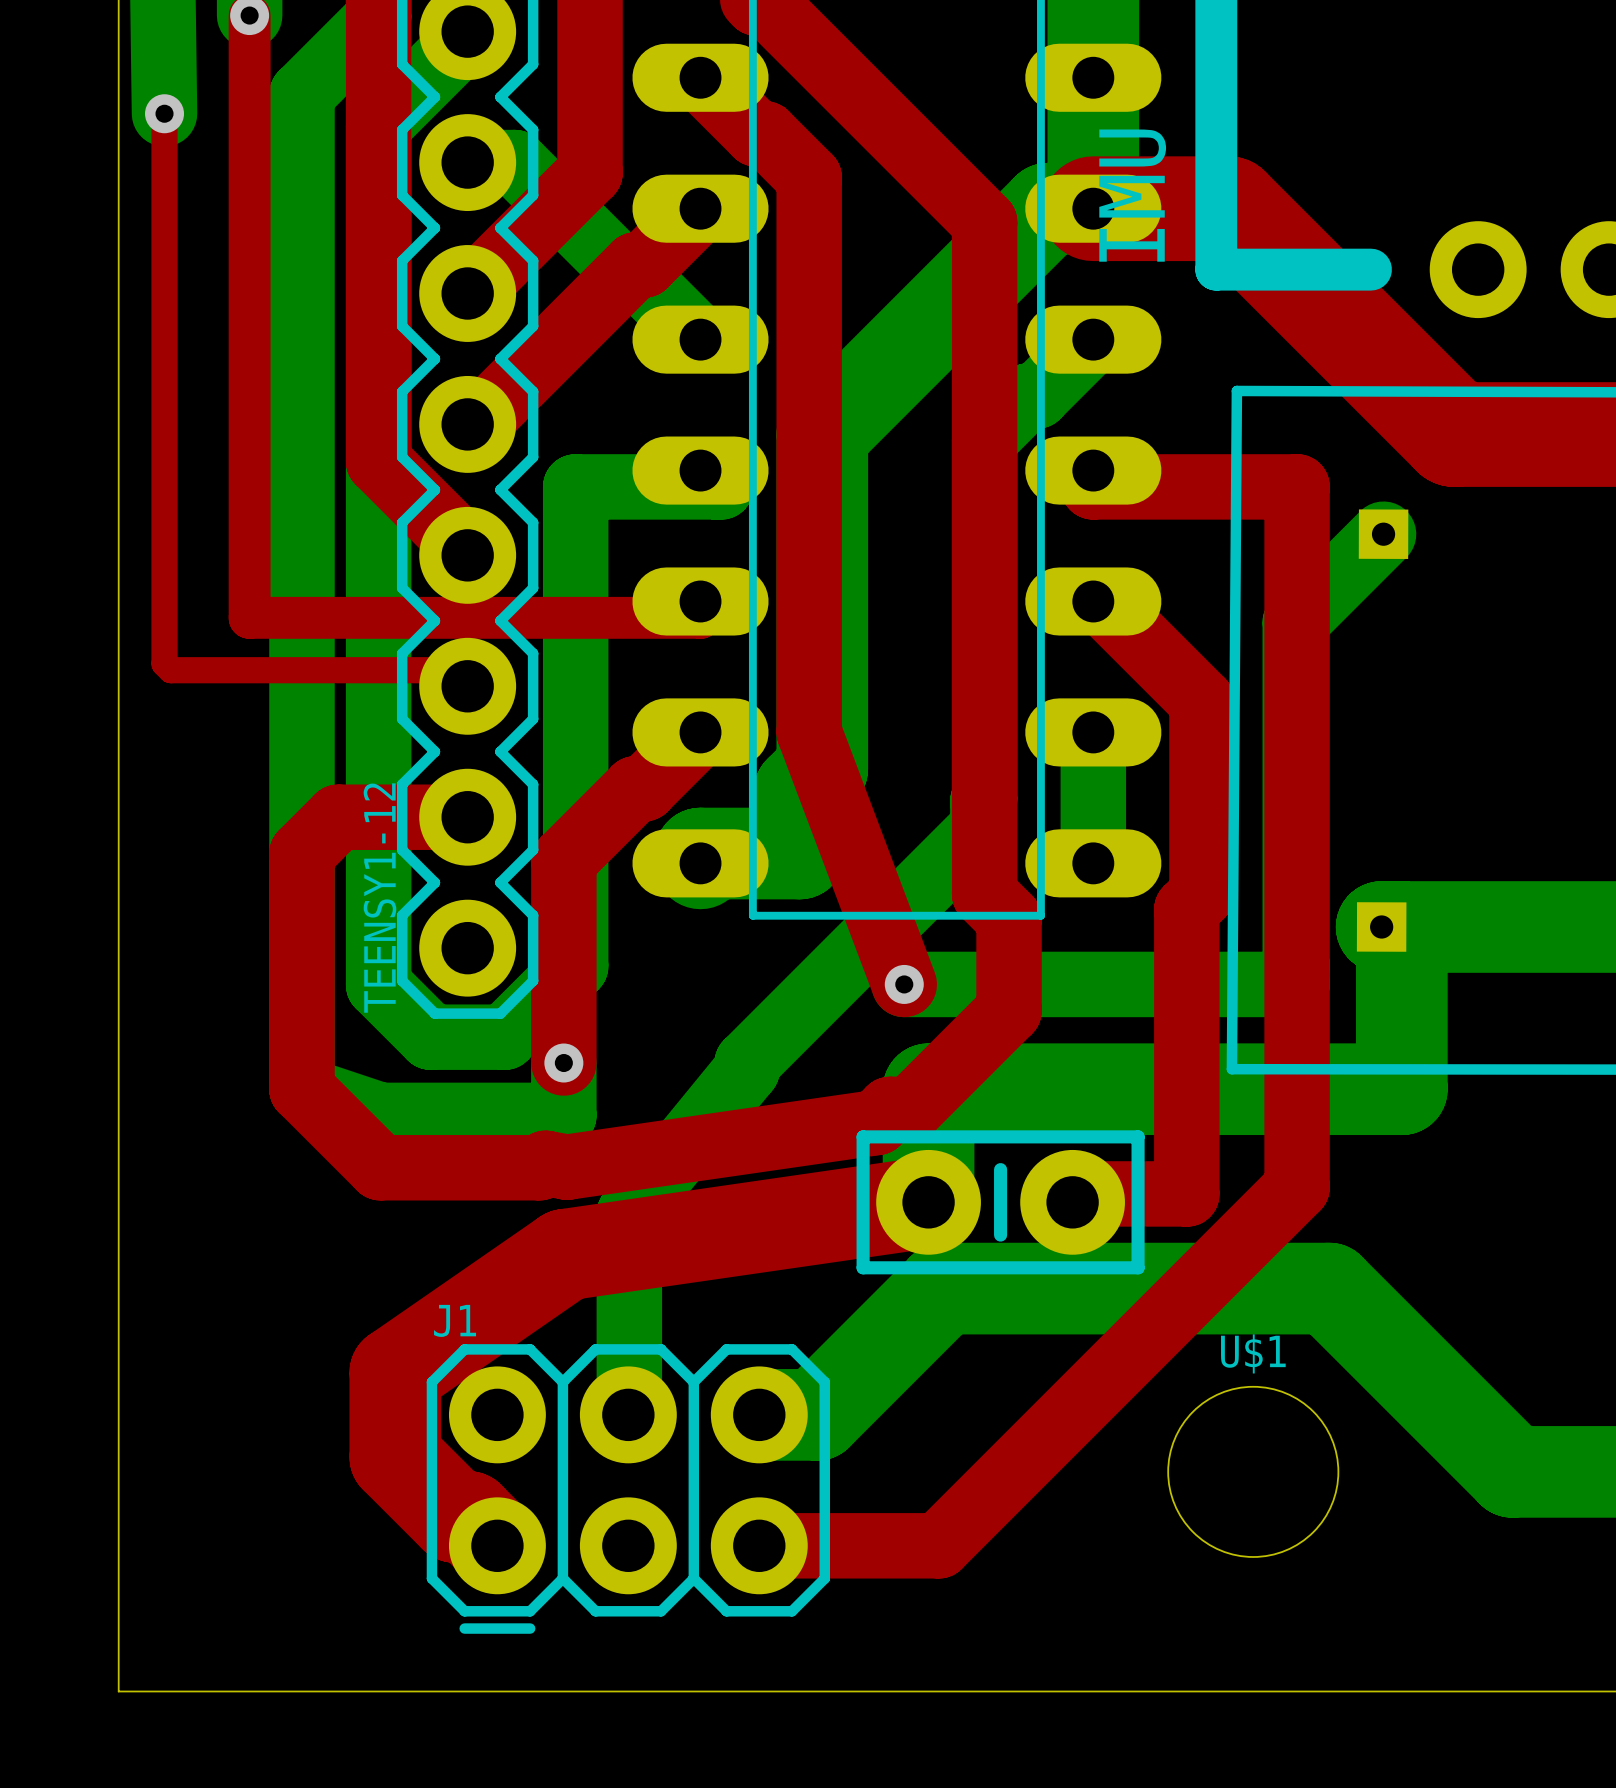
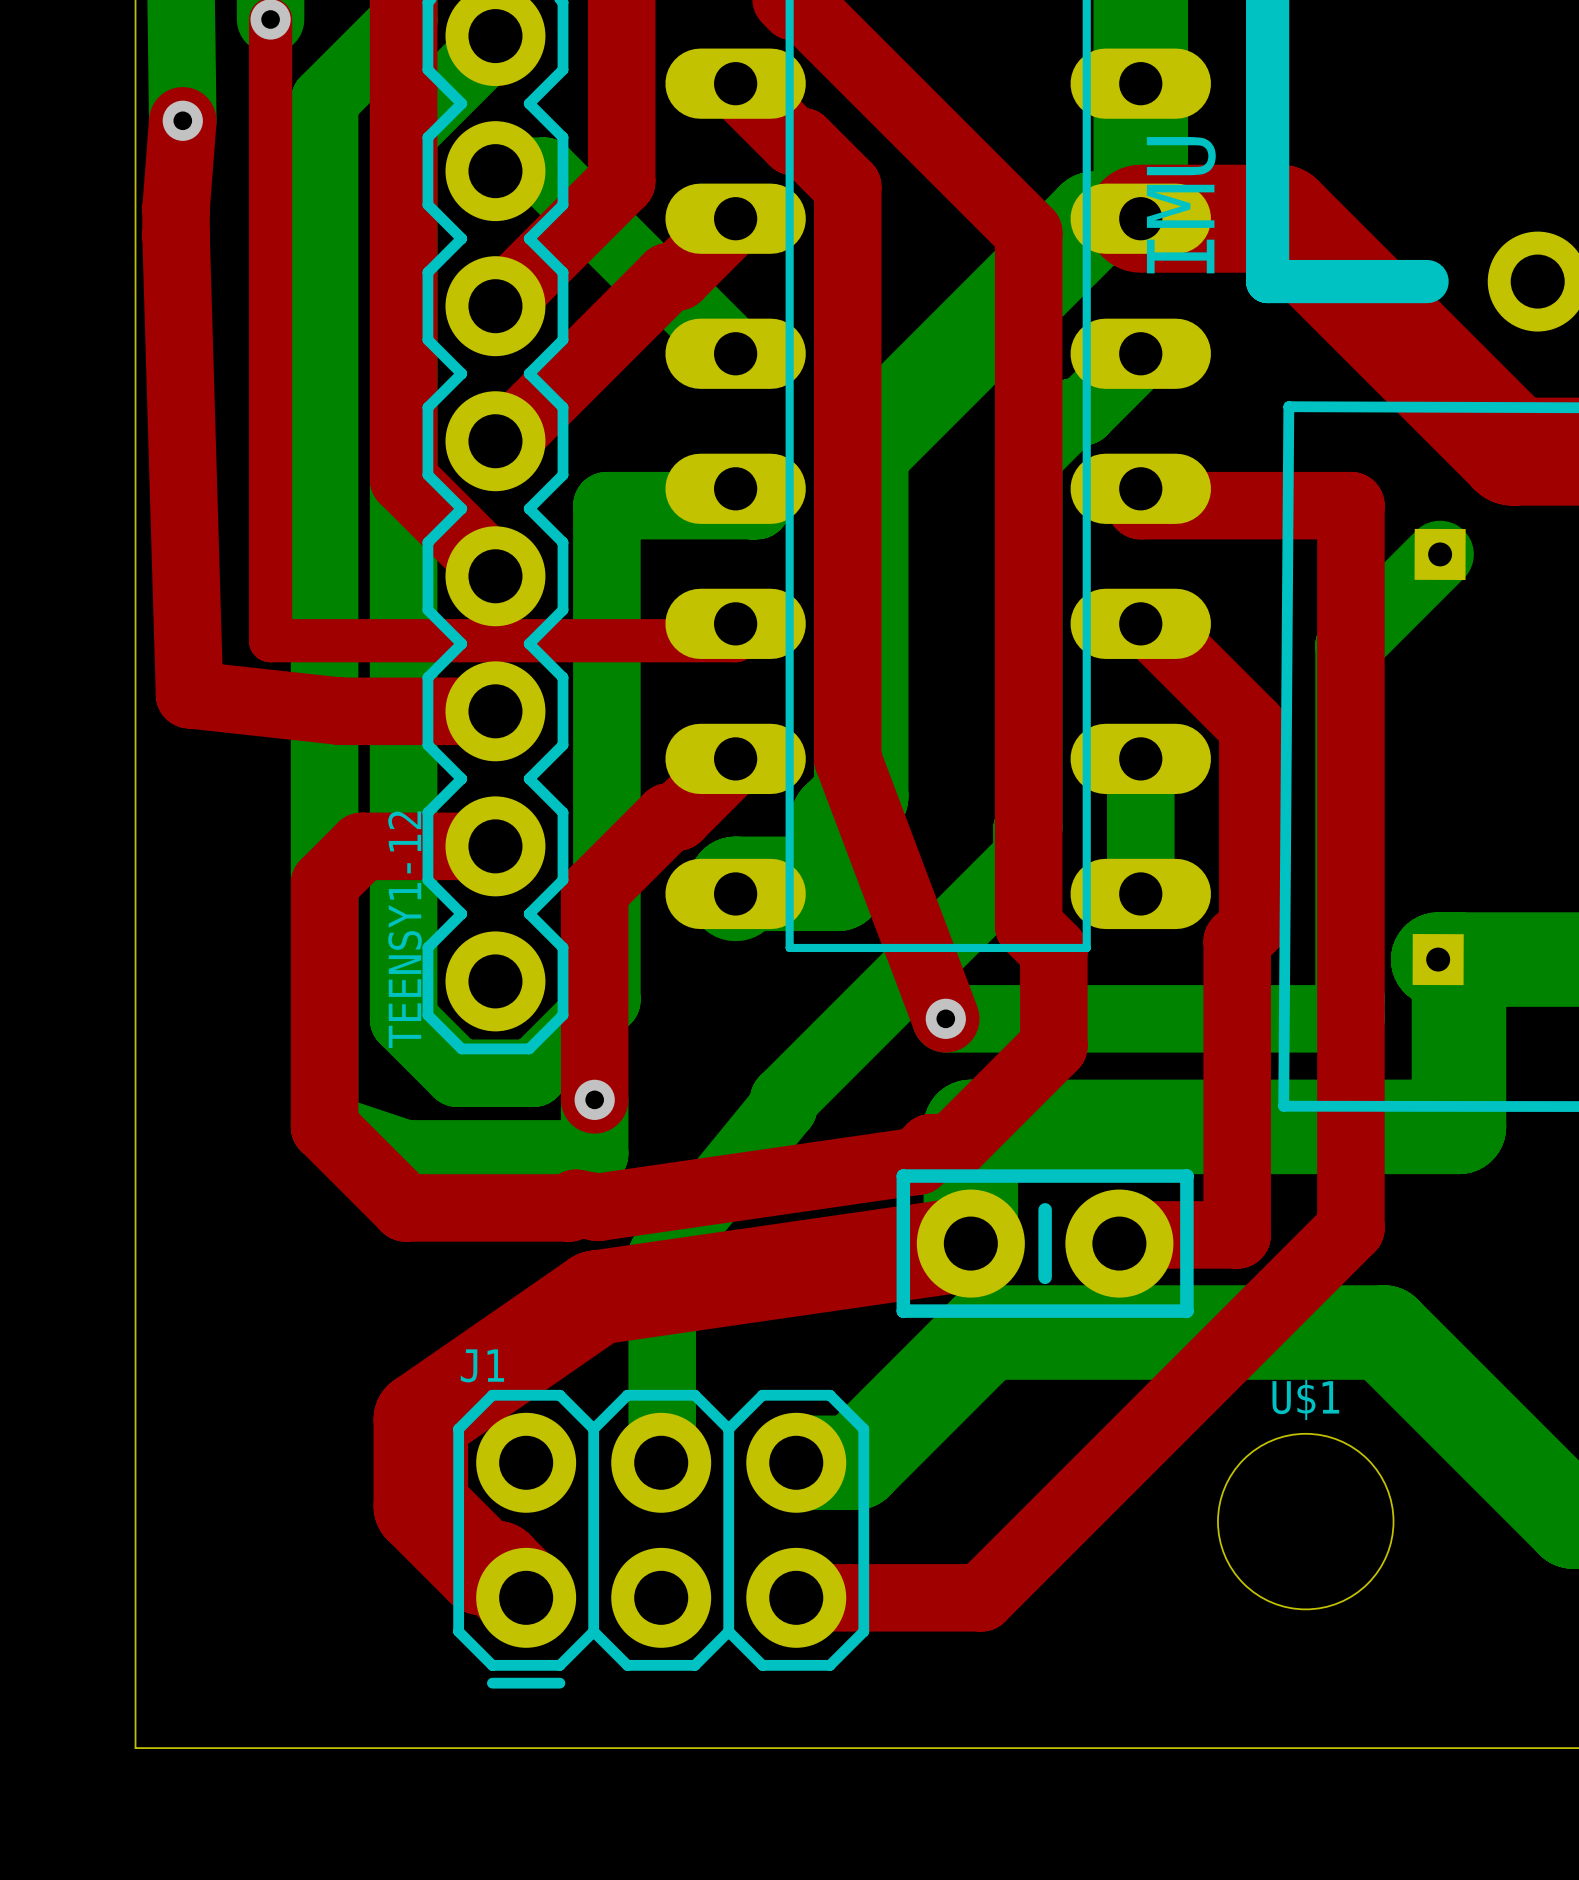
top track: (164, 113) (164, 663) (171, 670) (451, 670) (467, 686) -> (182, 120) (176, 208) (176, 235) (189, 694) (341, 711) (495, 711)

